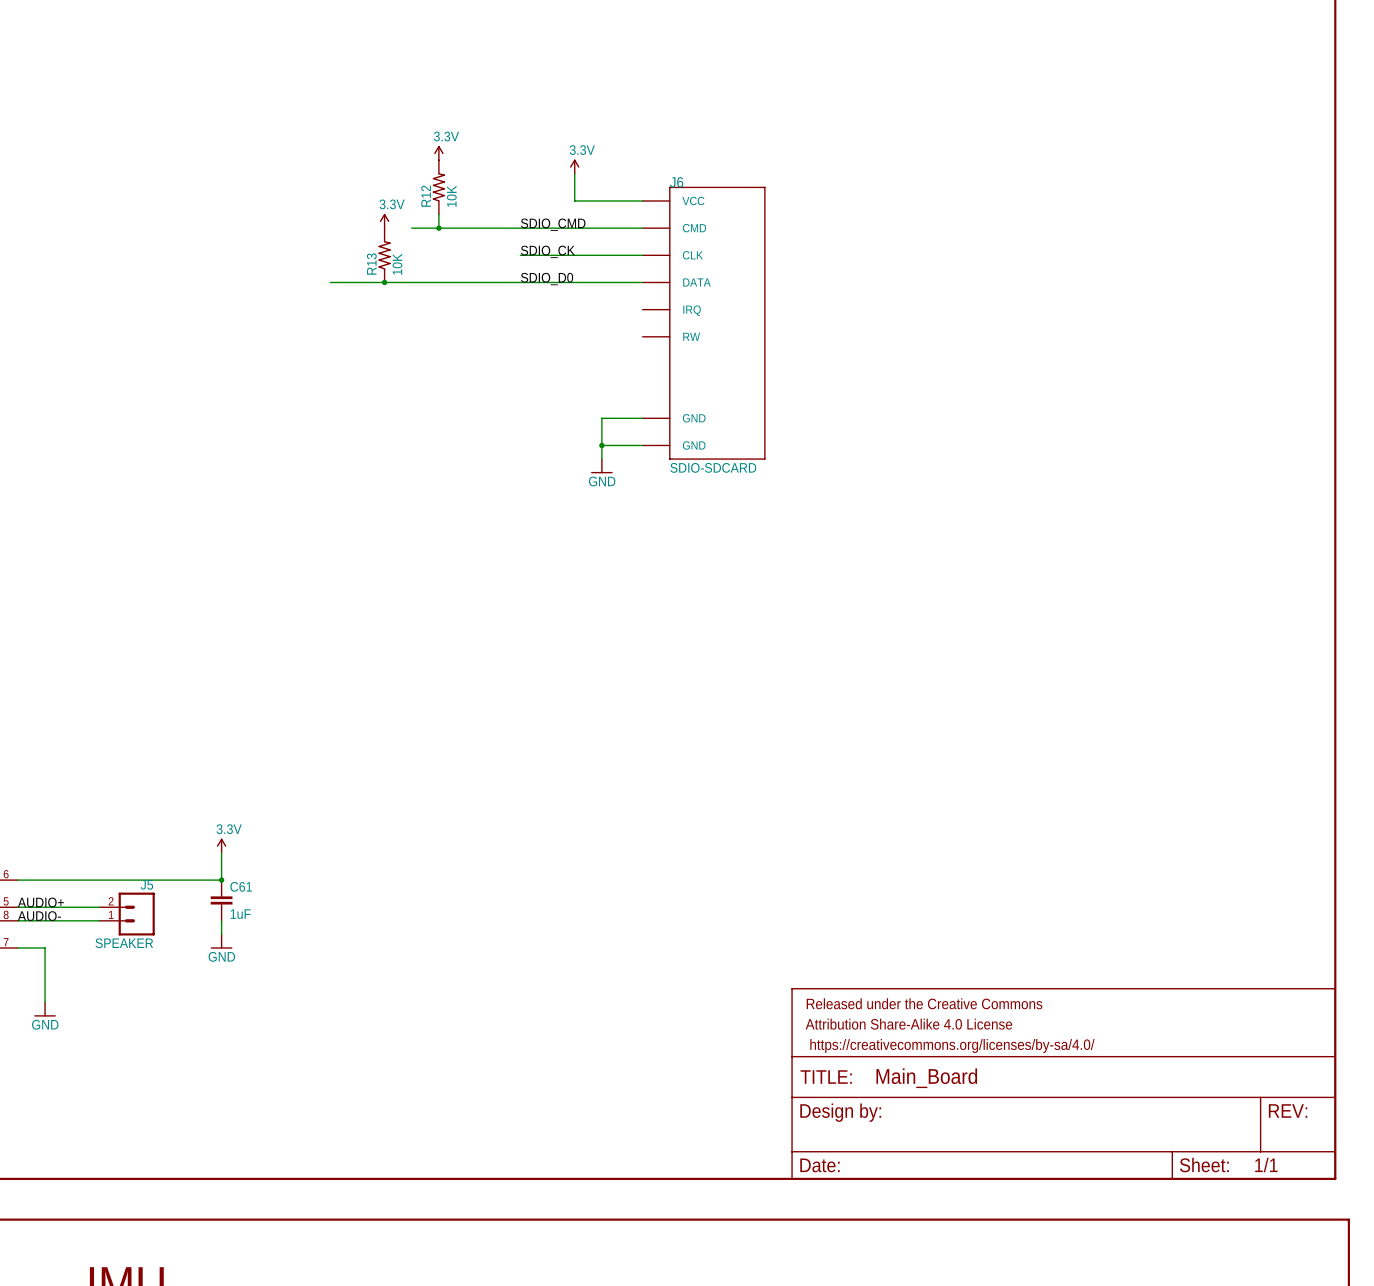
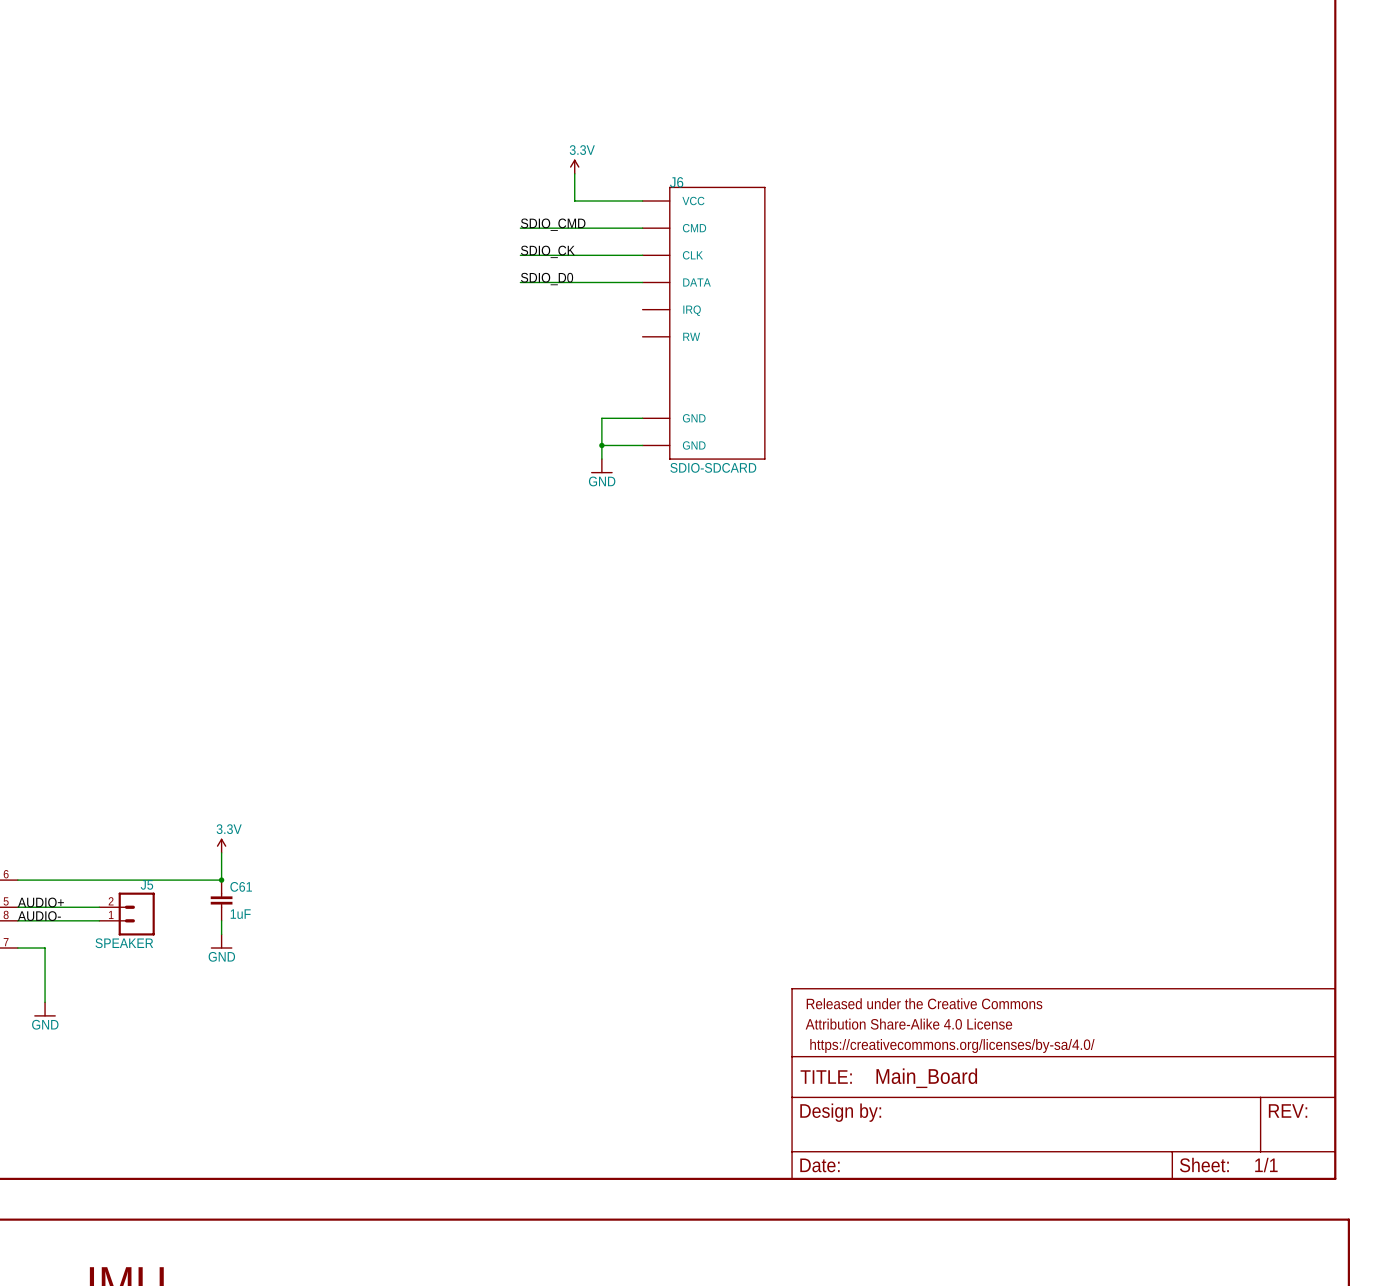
power symbol: 3.3V (438, 153) -> none
R12: 10K (438, 187) -> none
wire: (438, 214) (438, 228) -> none
power symbol: 3.3V (384, 221) -> none
wire: (411, 228) (520, 228) -> none
junction: (438, 228) -> none
R13: 10K (384, 255) -> none
wire: (330, 282) (520, 282) -> none
junction: (384, 282) -> none

